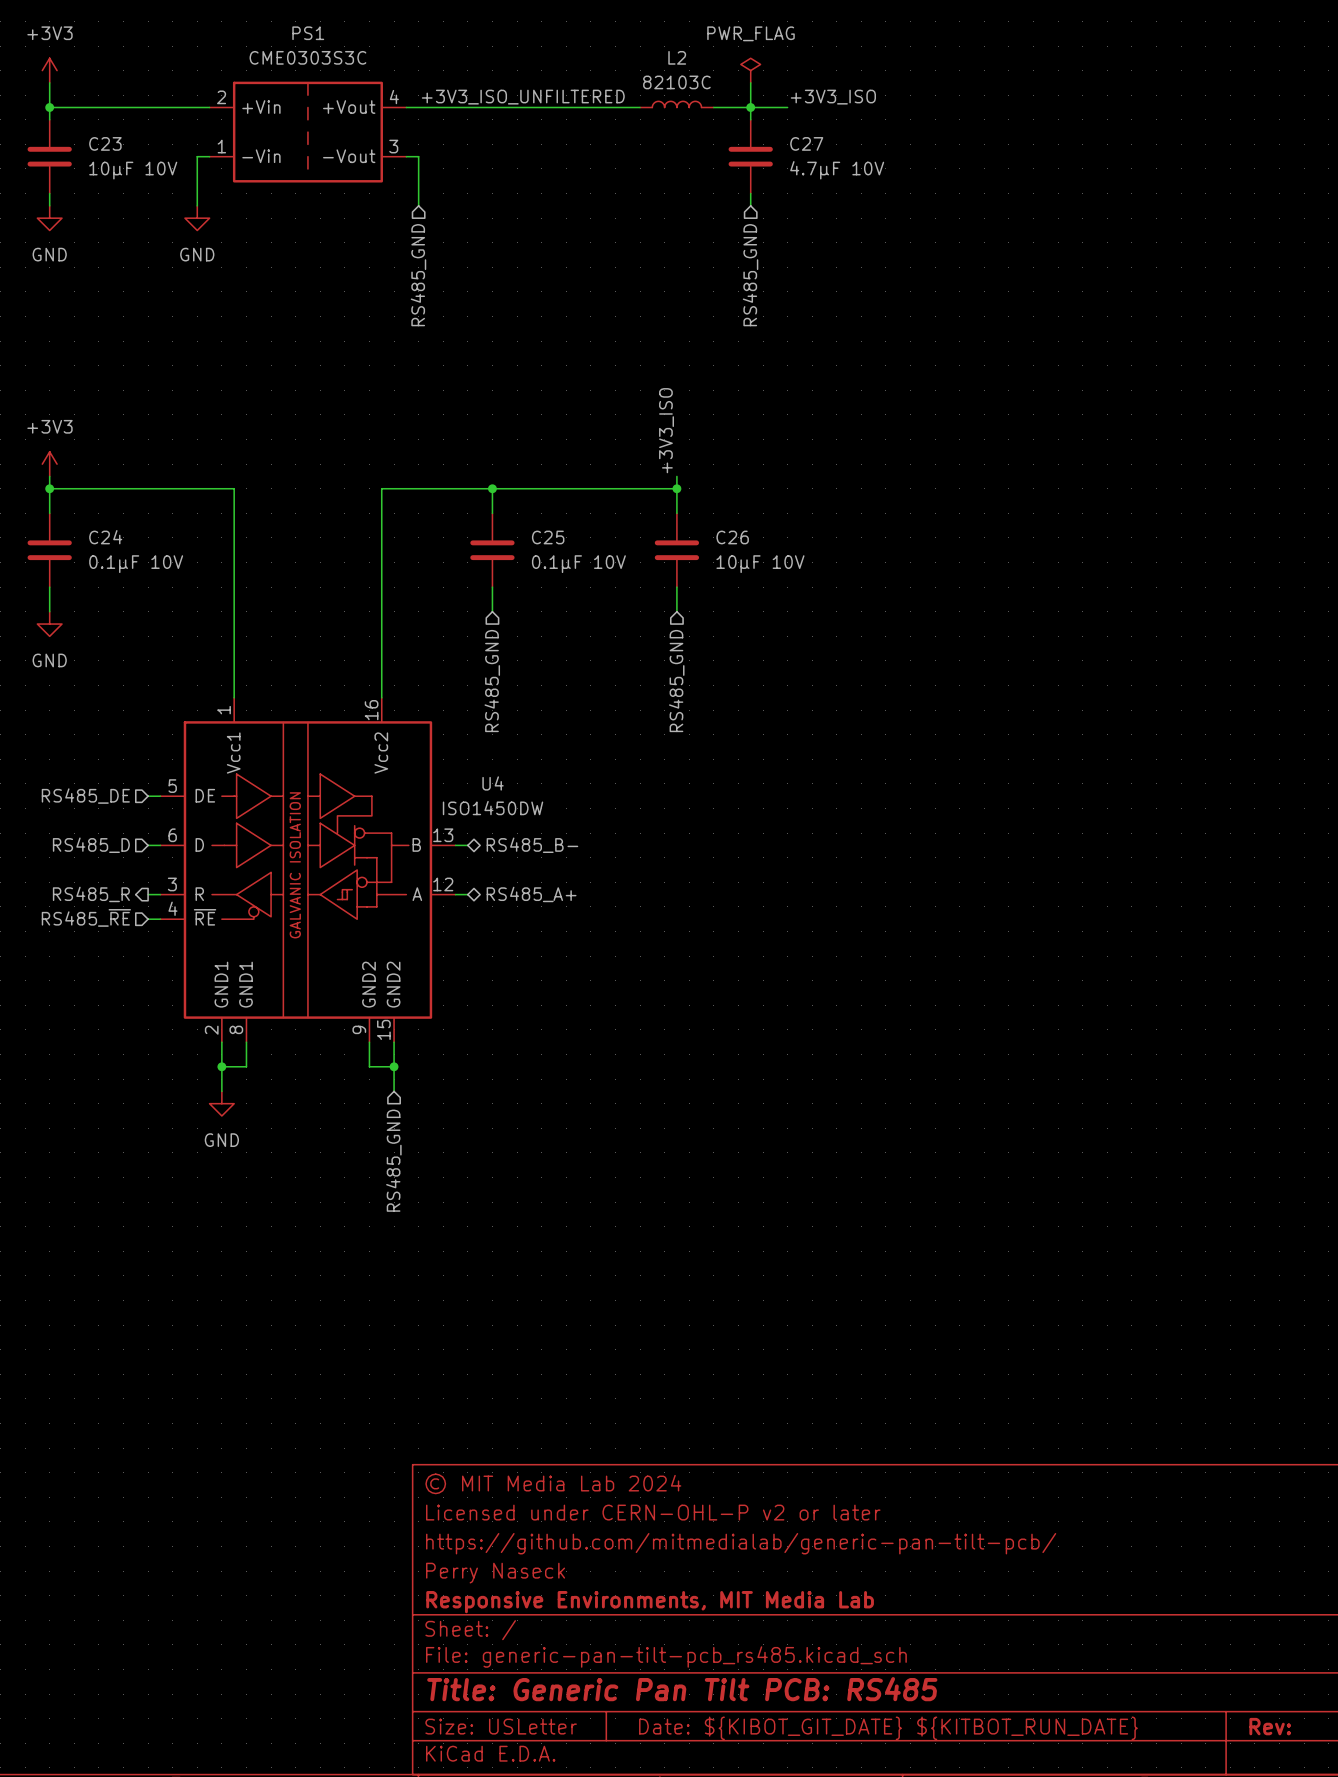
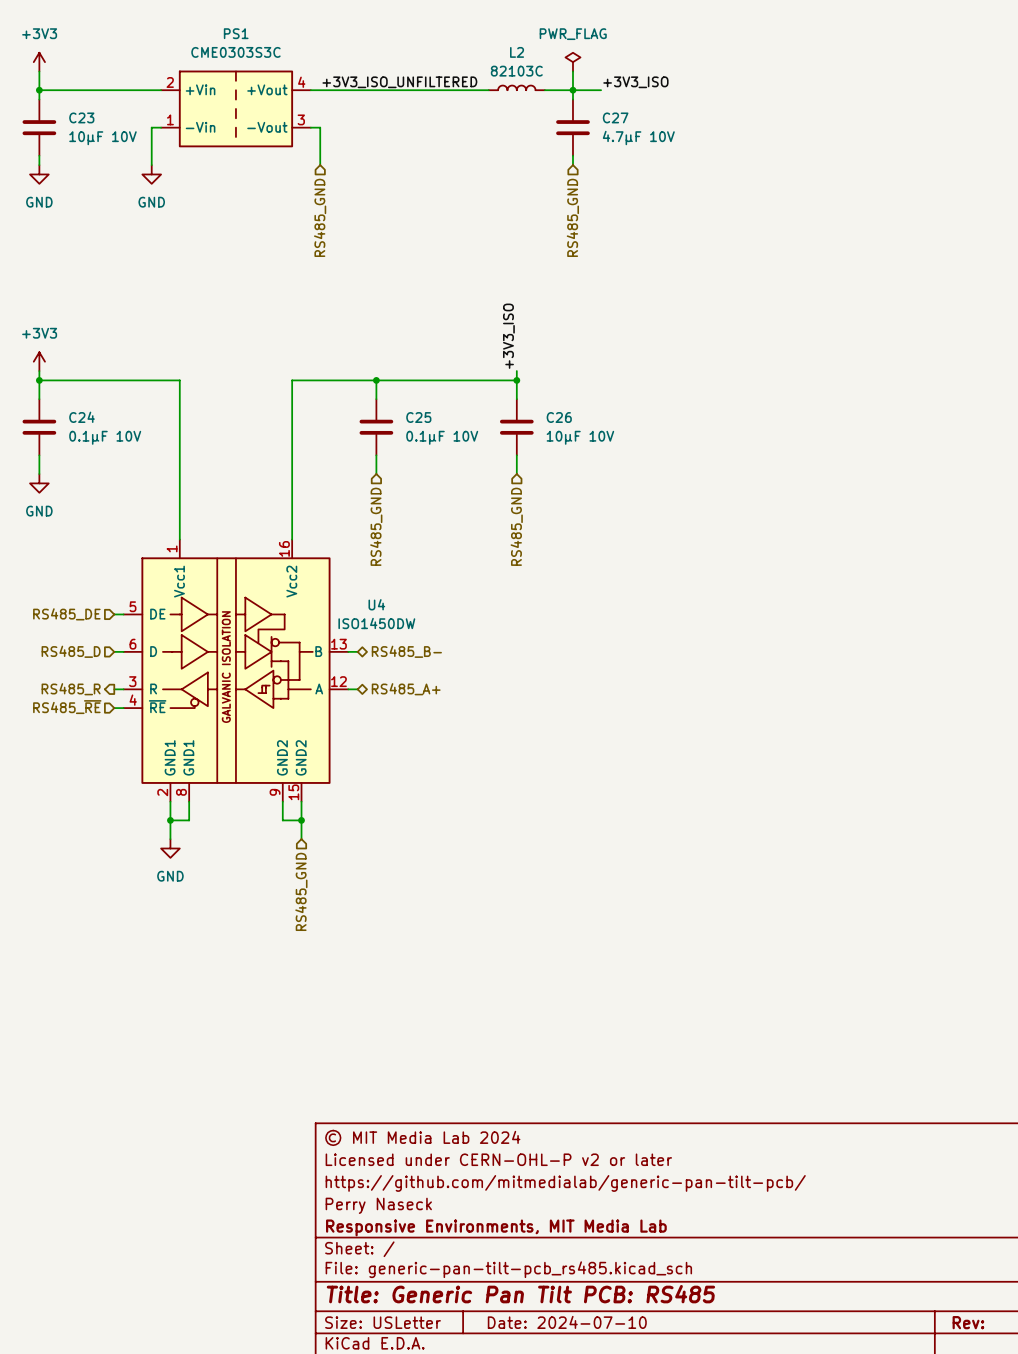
title block: Date: ${KIBOT_GIT_DATE} ${KITBOT_RUN_DATE} (888, 1728) -> Date: 2024-07-10 (567, 1322)

